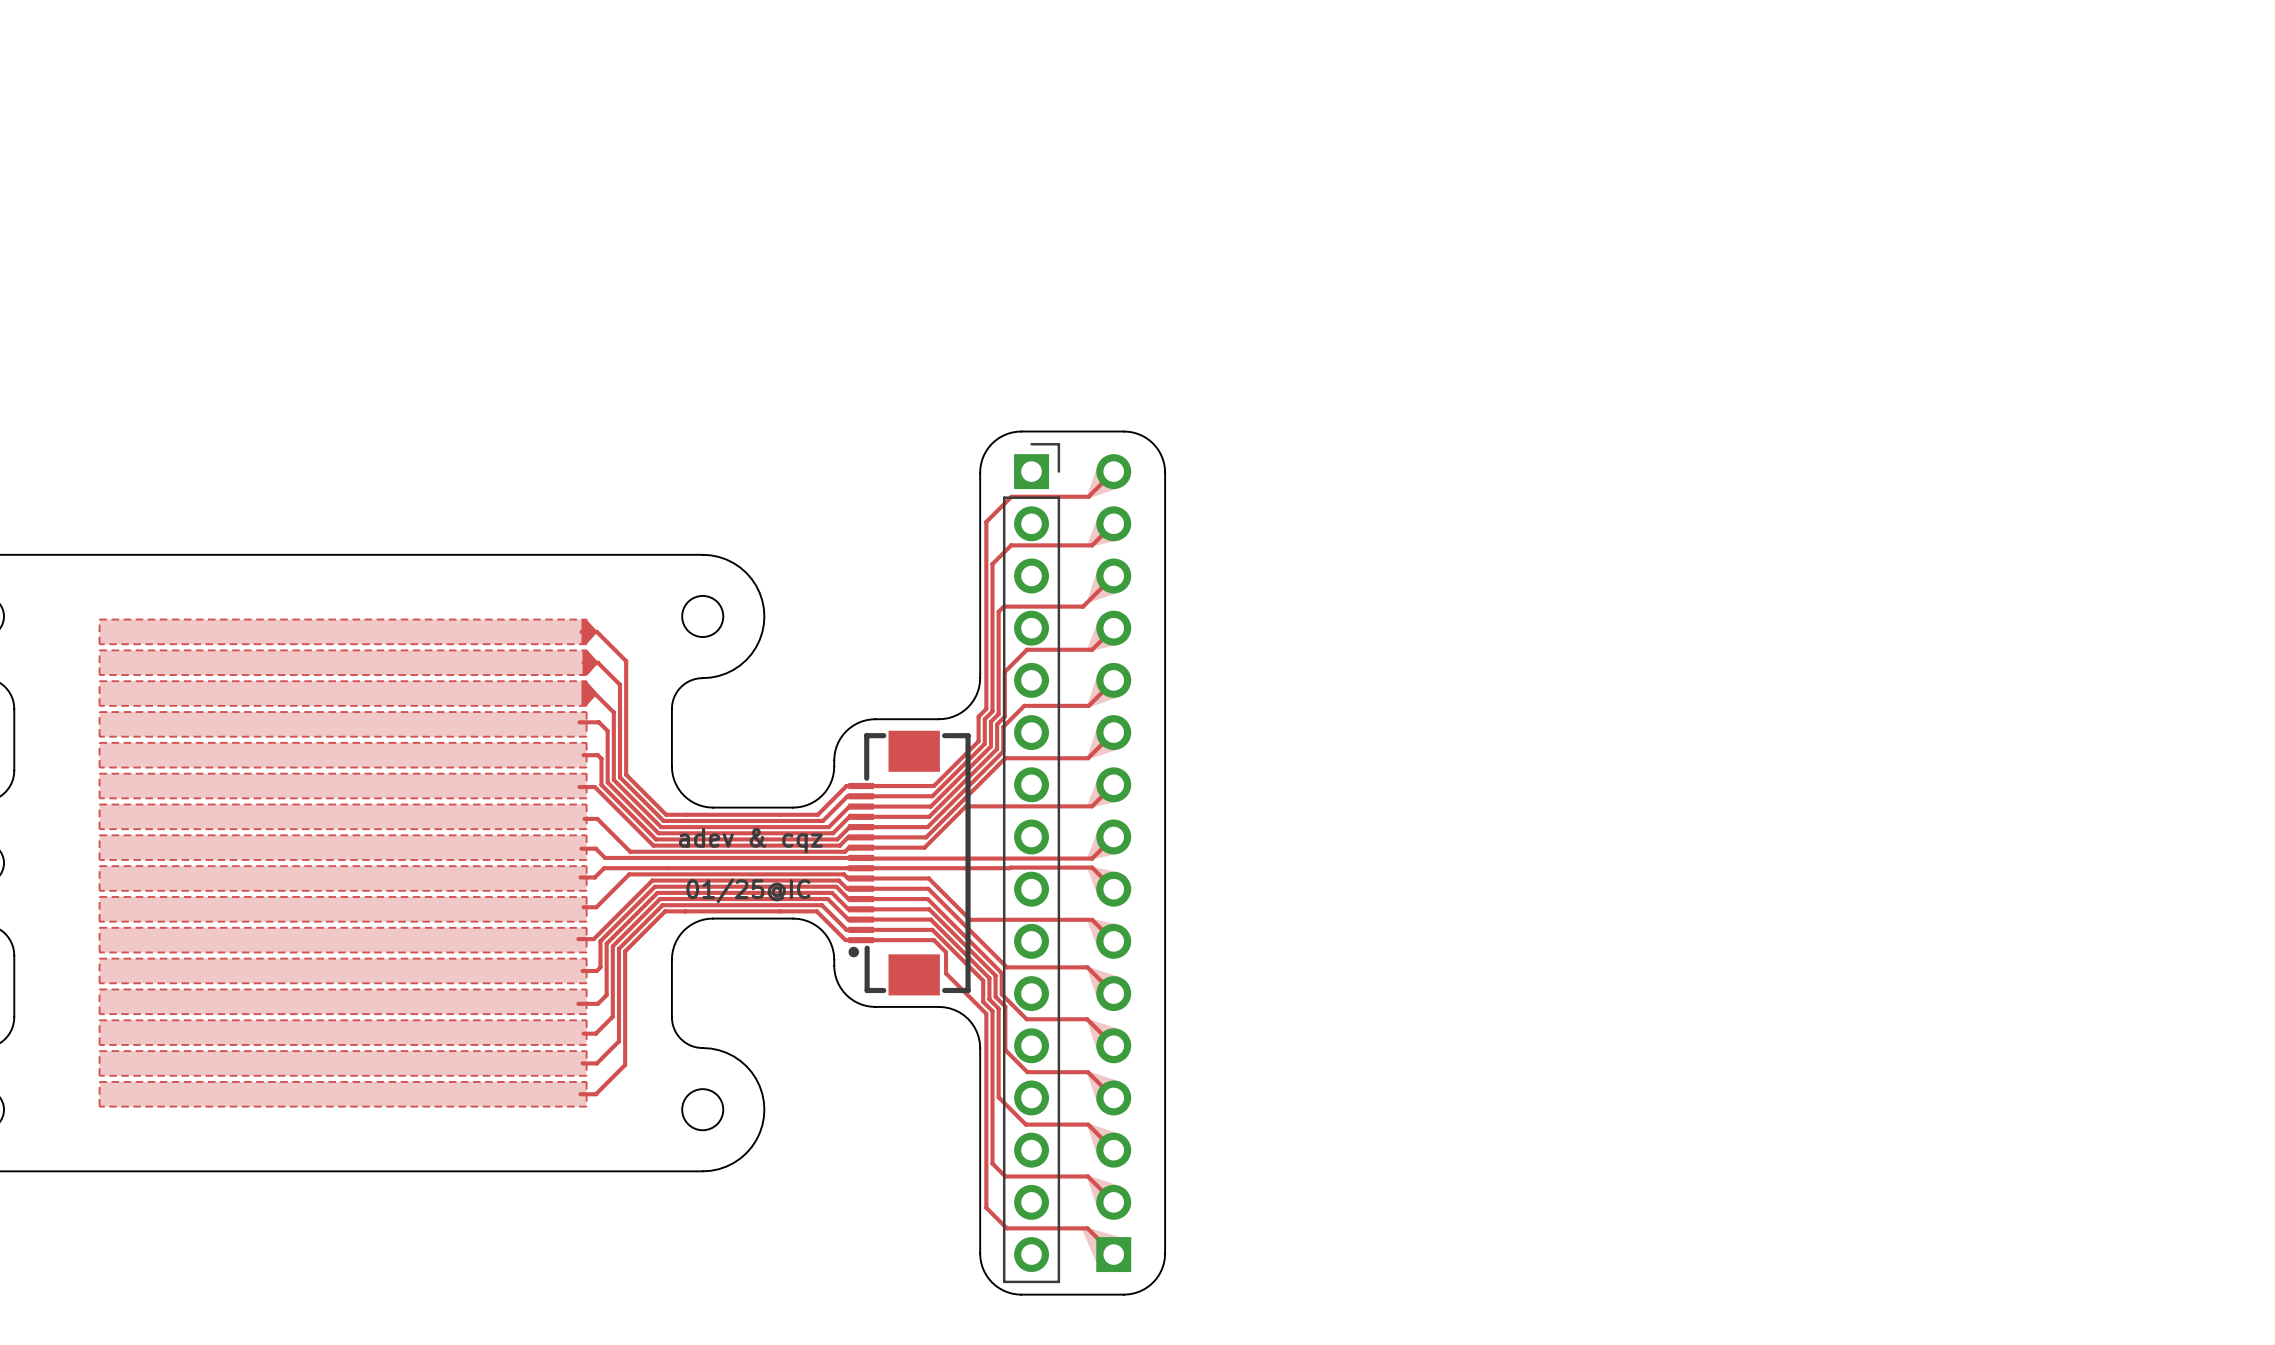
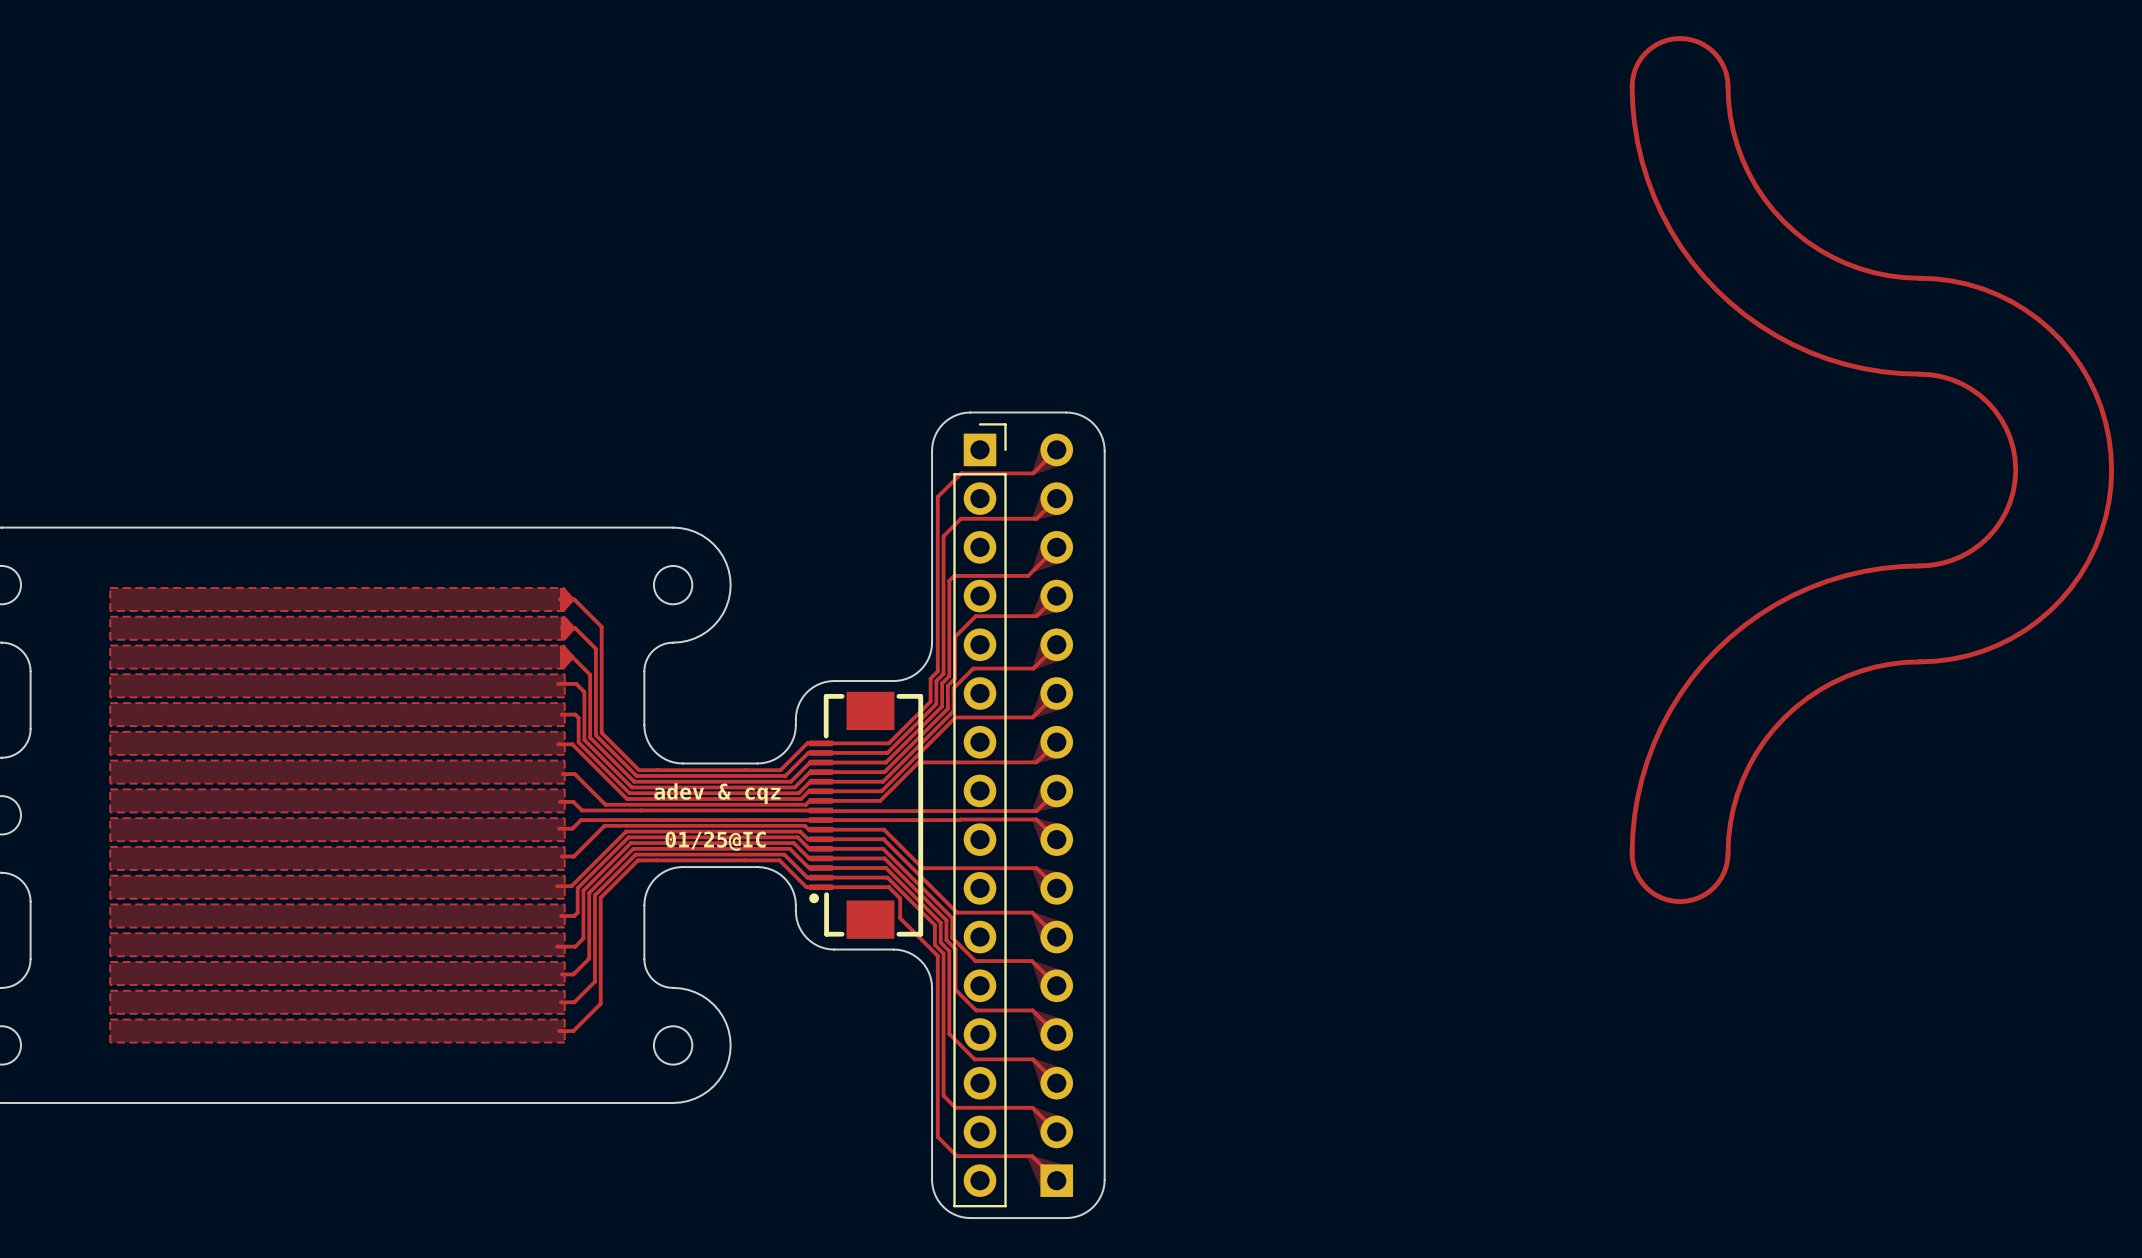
track: none -> (1632, 86) (1633, 74) (1638, 62) (1646, 52) (1661, 42) (1673, 38) (1686, 38) (1698, 42) (1709, 48) (1721, 62) (1726, 74) (1730, 116) (1742, 159) (1756, 186) (1784, 222) (1819, 249) (1860, 268) (1889, 275) (1935, 278) (1966, 284) (1996, 294) (2024, 309) (2060, 340) (2088, 378) (2101, 407) (2110, 454) (2110, 485) (2101, 532) (2088, 561) (2060, 599) (2024, 630) (1996, 645) (1951, 659) (1889, 664) (1860, 671) (1819, 690) (1795, 707) (1764, 740) (1742, 780) (1733, 808) (1727, 859) (1721, 877) (1713, 887) (1704, 895) (1692, 899) (1680, 901) (1661, 897) (1650, 891) (1642, 882) (1635, 871) (1632, 859) (1632, 834) (1637, 797) (1647, 761) (1670, 709) (1691, 678) (1730, 637) (1759, 614) (1792, 595) (1845, 575) (1882, 568) (1941, 563) (1970, 551) (1987, 537) (2006, 511) (2015, 480) (2015, 459) (2010, 438) (2001, 419) (1987, 402) (1970, 388) (1941, 376) (1863, 368) (1809, 352) (1759, 325) (1716, 289) (1680, 246) (1654, 196) (1637, 142) (1632, 86)

